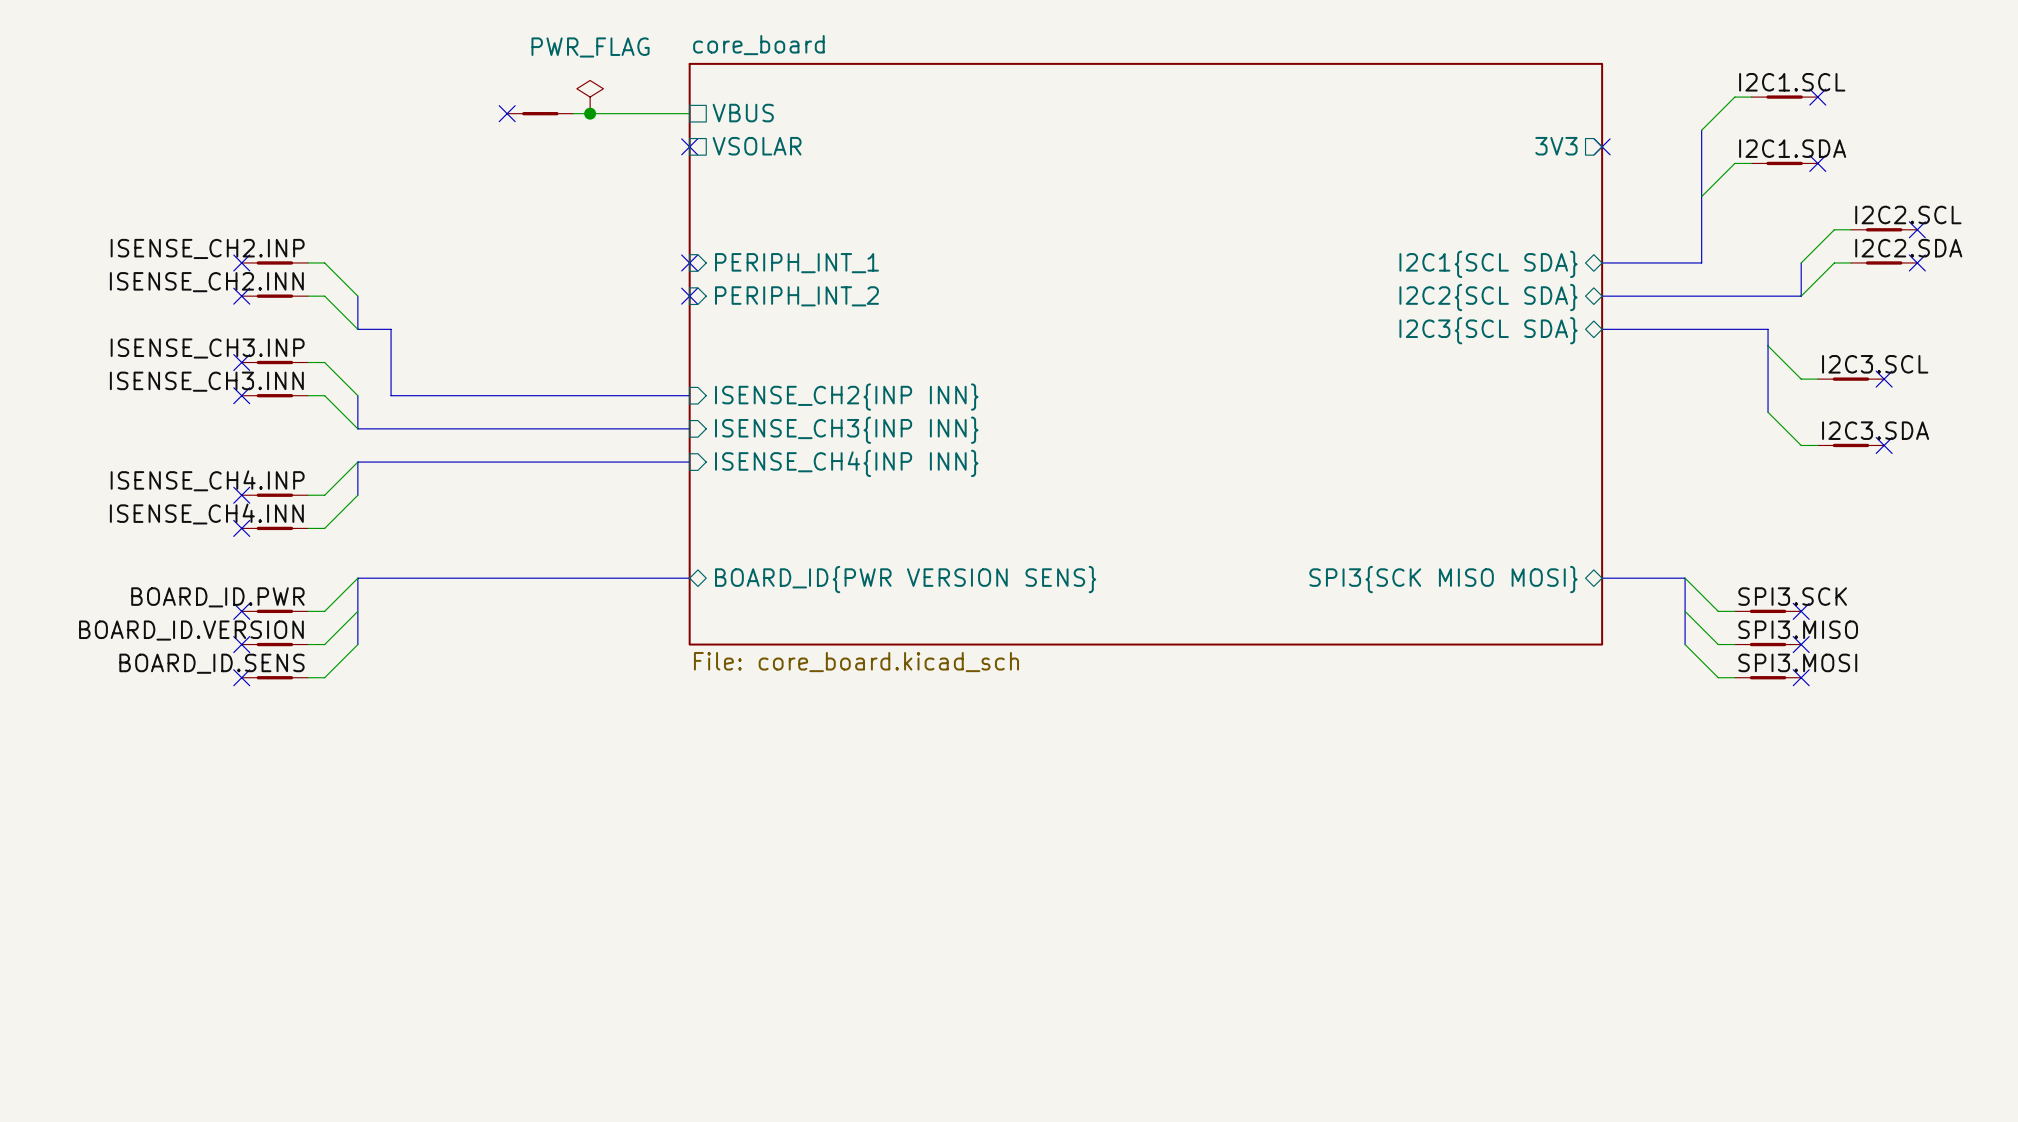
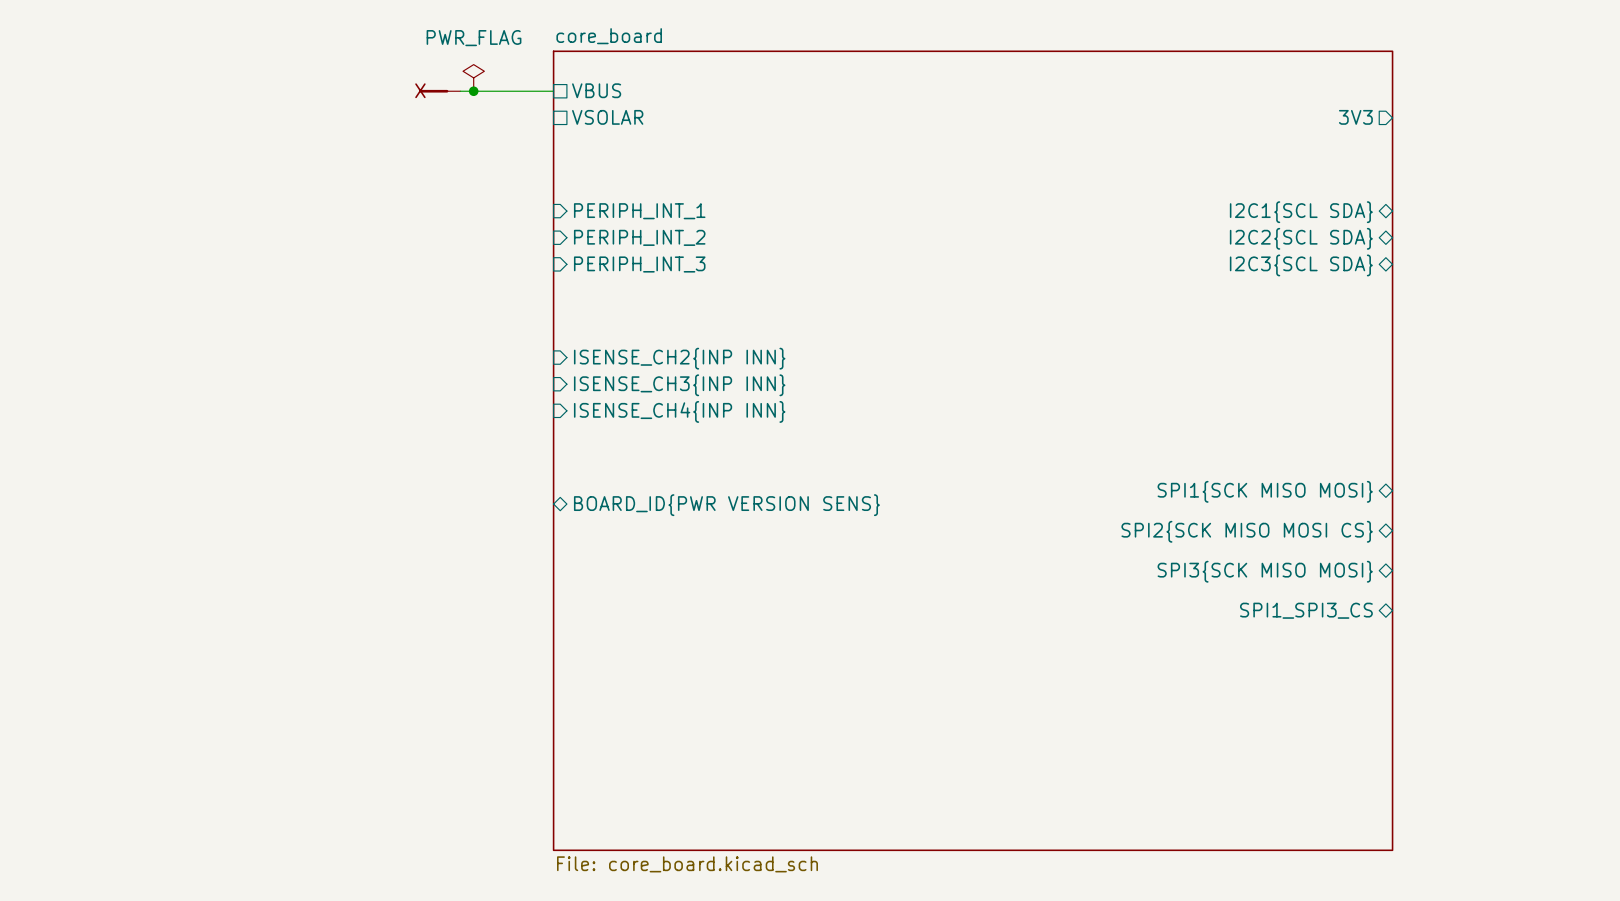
label: I2C1.SCL (1792, 82) -> none
wire: (1751, 97) (1734, 97) (1701, 130) -> none
part: (1784, 97) -> none
no-connect mark: (1817, 97) -> none
part symbol: [507, 112, 574, 116] -> [419, 89, 461, 93]
no-connect mark: (507, 113) -> none
bus: (1701, 130) (1701, 262) (1602, 262) -> none
no-connect mark: (689, 146) -> none
sheet pin position: 3V3 (1556, 146) -> 3V3 (1355, 117)
no-connect mark: (1602, 146) -> none
label: I2C1.SDA (1792, 148) -> none
wire: (1751, 163) (1734, 163) (1701, 196) -> none
part: (1784, 163) -> none
no-connect mark: (1817, 163) -> none
label: I2C2.SCL (1908, 214) -> none
wire: (1850, 229) (1834, 229) (1801, 262) -> none
part: (1884, 229) -> none
no-connect mark: (1917, 229) -> none
label: ISENSE_CH2.INP (207, 248) -> none
label: I2C2.SDA (1908, 248) -> none
no-connect mark: (241, 262) -> none
part: (274, 262) -> none
wire: (308, 262) (324, 262) (357, 296) -> none
no-connect mark: (689, 262) -> none
bus: (1801, 262) (1801, 296) (1602, 296) -> none
wire: (1850, 262) (1834, 262) (1801, 296) -> none
part: (1884, 262) -> none
no-connect mark: (1917, 262) -> none
sheet pin position: I2C1{SCL SDA} (1488, 264) -> I2C1{SCL SDA} (1301, 212)
label: ISENSE_CH2.INN (206, 282) -> none
no-connect mark: (241, 296) -> none
part: (274, 296) -> none
wire: (308, 296) (324, 296) (357, 329) -> none
bus: (357, 296) (357, 329) (391, 329) (391, 395) (689, 395) -> none
no-connect mark: (689, 296) -> none
sheet pin position: I2C2{SCL SDA} (1488, 297) -> I2C2{SCL SDA} (1301, 238)
sheet pin: none -> PERIPH_INT_3 (639, 264)
bus: (1602, 329) (1768, 329) (1768, 412) -> none
sheet pin position: I2C3{SCL SDA} (1488, 330) -> I2C3{SCL SDA} (1301, 265)
wire: (1768, 345) (1801, 379) (1817, 379) -> none
label: ISENSE_CH3.INP (207, 348) -> none
sheet core_board: File: core_board.kicad_sch (1145, 354) -> none
no-connect mark: (241, 362) -> none
part: (274, 362) -> none
wire: (308, 362) (324, 362) (357, 395) -> none
label: I2C3.SCL (1875, 364) -> none
part: (1850, 379) -> none
no-connect mark: (1884, 379) -> none
label: ISENSE_CH3.INN (206, 381) -> none
no-connect mark: (241, 395) -> none
part: (274, 395) -> none
wire: (308, 395) (324, 395) (357, 428) -> none
bus: (357, 395) (357, 428) (689, 428) -> none
sheet pin position: ISENSE_CH2{INP INN} (846, 397) -> ISENSE_CH2{INP INN} (679, 358)
wire: (1768, 412) (1801, 445) (1817, 445) -> none
sheet pin position: ISENSE_CH3{INP INN} (846, 430) -> ISENSE_CH3{INP INN} (679, 385)
label: I2C3.SDA (1875, 430) -> none
part: (1850, 445) -> none
no-connect mark: (1884, 445) -> none
wire: (357, 462) (324, 495) (308, 495) -> none
bus: (689, 462) (357, 462) (357, 495) -> none
sheet pin position: ISENSE_CH4{INP INN} (846, 463) -> ISENSE_CH4{INP INN} (679, 411)
label: ISENSE_CH4.INP (207, 480) -> none
no-connect mark: (241, 495) -> none
part: (274, 495) -> none
wire: (357, 495) (324, 528) (308, 528) -> none
label: ISENSE_CH4.INN (206, 514) -> none
no-connect mark: (241, 528) -> none
part: (274, 528) -> none
sheet core_board: none -> File: core_board.kicad_sch (973, 450)
wire: (357, 578) (324, 611) (308, 611) -> none
bus: (689, 578) (357, 578) (357, 644) -> none
bus: (1602, 578) (1685, 578) (1685, 644) -> none
wire: (1685, 578) (1718, 611) (1734, 611) -> none
sheet pin position: BOARD_ID{PWR VERSION SENS} (905, 579) -> BOARD_ID{PWR VERSION SENS} (726, 505)
sheet pin position: SPI3{SCK MISO MOSI} (1443, 579) -> SPI3{SCK MISO MOSI} (1265, 571)
label: SPI3.SCK (1792, 596) -> none
label: BOARD_ID.PWR (217, 597) -> none
no-connect mark: (241, 611) -> none
part: (274, 611) -> none
wire: (357, 611) (324, 644) (308, 644) -> none
wire: (1685, 611) (1718, 644) (1734, 644) -> none
part: (1768, 611) -> none
no-connect mark: (1801, 611) -> none
sheet pin: none -> SPI1{SCK MISO MOSI} (1265, 491)
label: SPI3.MISO (1798, 629) -> none
label: BOARD_ID.VERSION (191, 630) -> none
no-connect mark: (241, 644) -> none
part: (274, 644) -> none
wire: (357, 644) (324, 677) (308, 677) -> none
wire: (1685, 644) (1718, 677) (1734, 677) -> none
part: (1768, 644) -> none
no-connect mark: (1801, 644) -> none
sheet pin: none -> SPI2{SCK MISO MOSI CS} (1247, 531)
label: SPI3.MOSI (1797, 662) -> none
label: BOARD_ID.SENS (211, 663) -> none
no-connect mark: (241, 677) -> none
part: (274, 677) -> none
part: (1768, 677) -> none
no-connect mark: (1801, 677) -> none
sheet pin: none -> SPI1_SPI3_CS (1306, 610)

